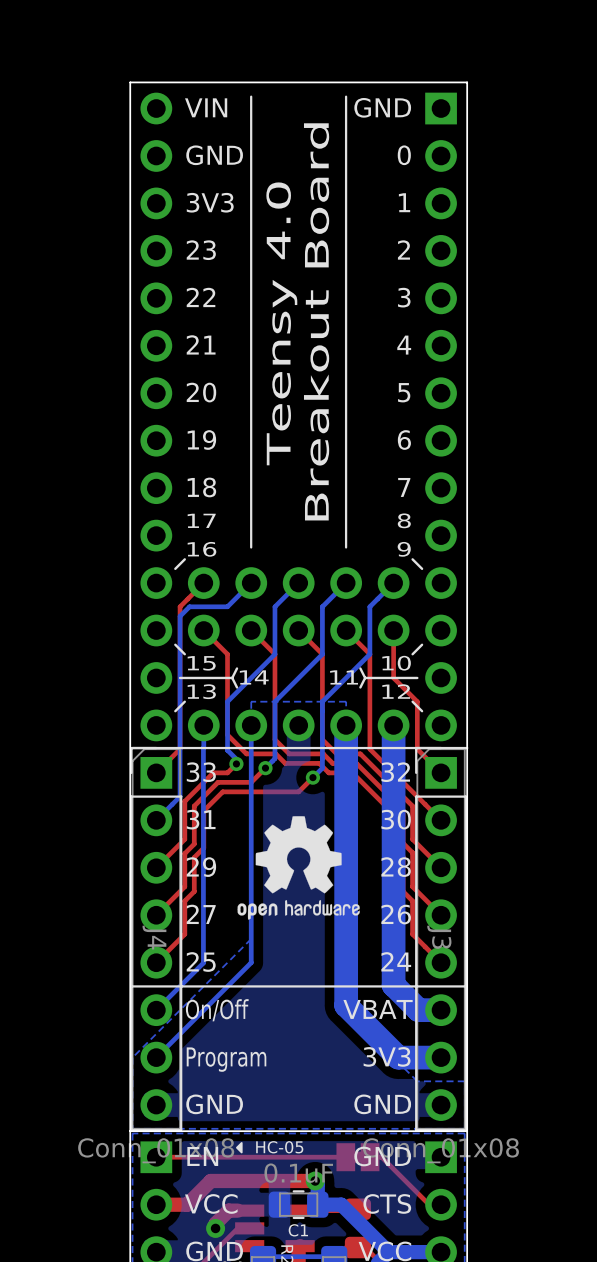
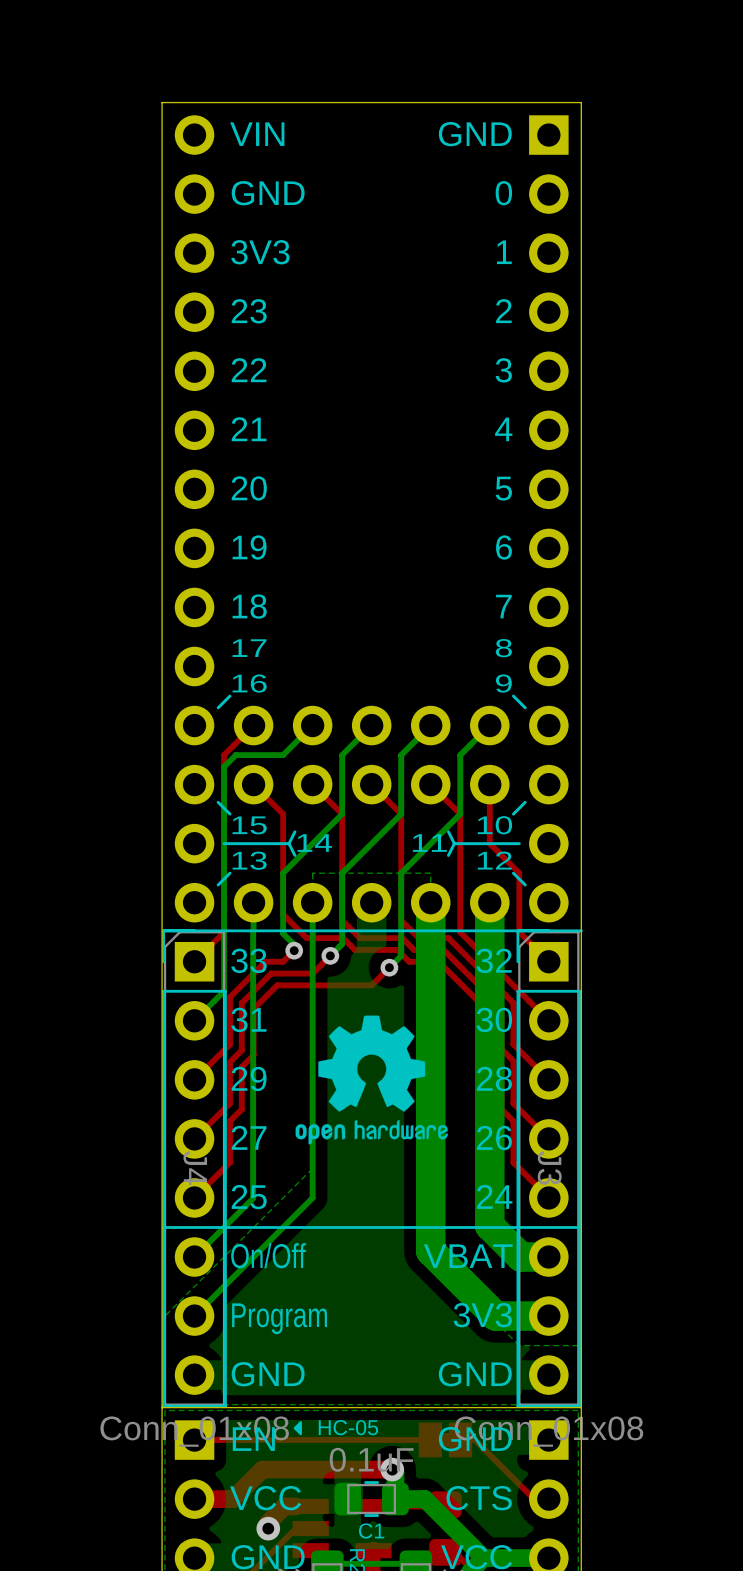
line: (251, 96) (251, 547) -> none
line: (346, 96) (346, 547) -> none
text: Breakout Board (316, 321) -> none
text: Teensy 4.0 (281, 323) -> none

